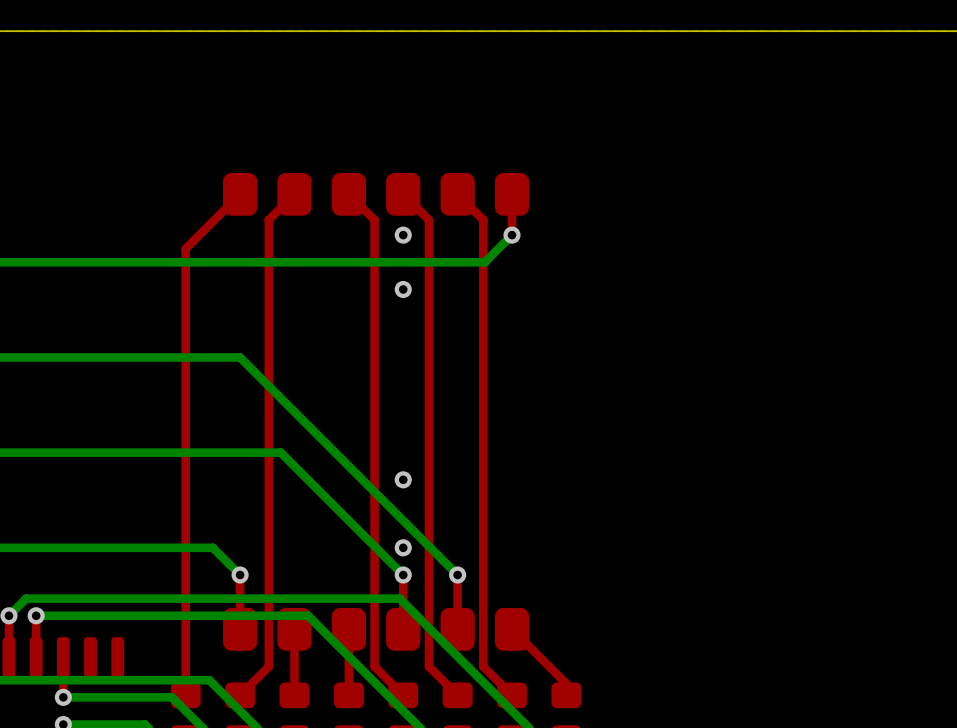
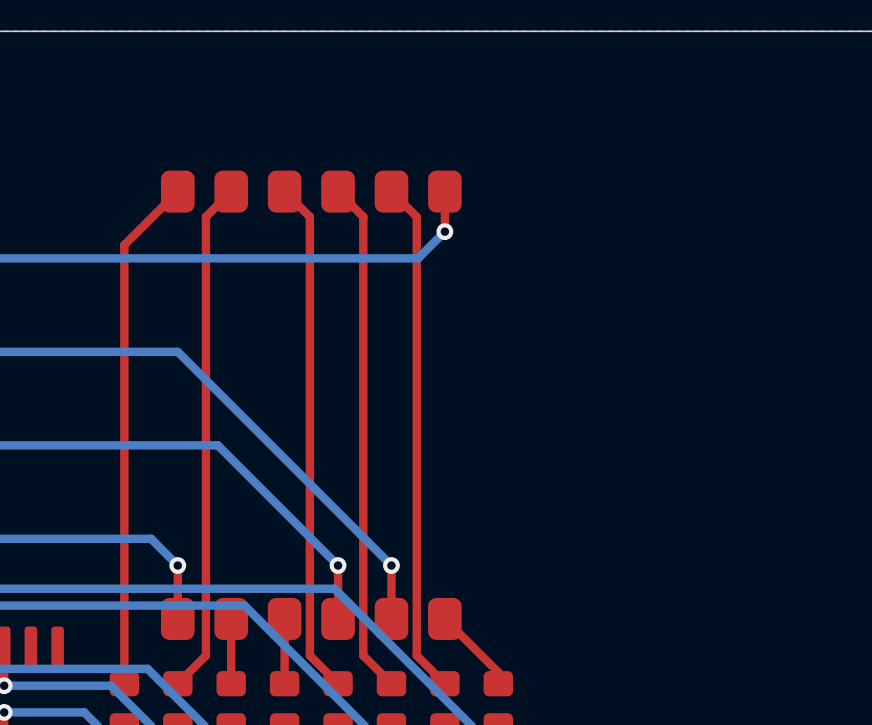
via: (403, 235) -> none
via: (403, 289) -> none
via: (403, 479) -> none
via: (403, 547) -> none

